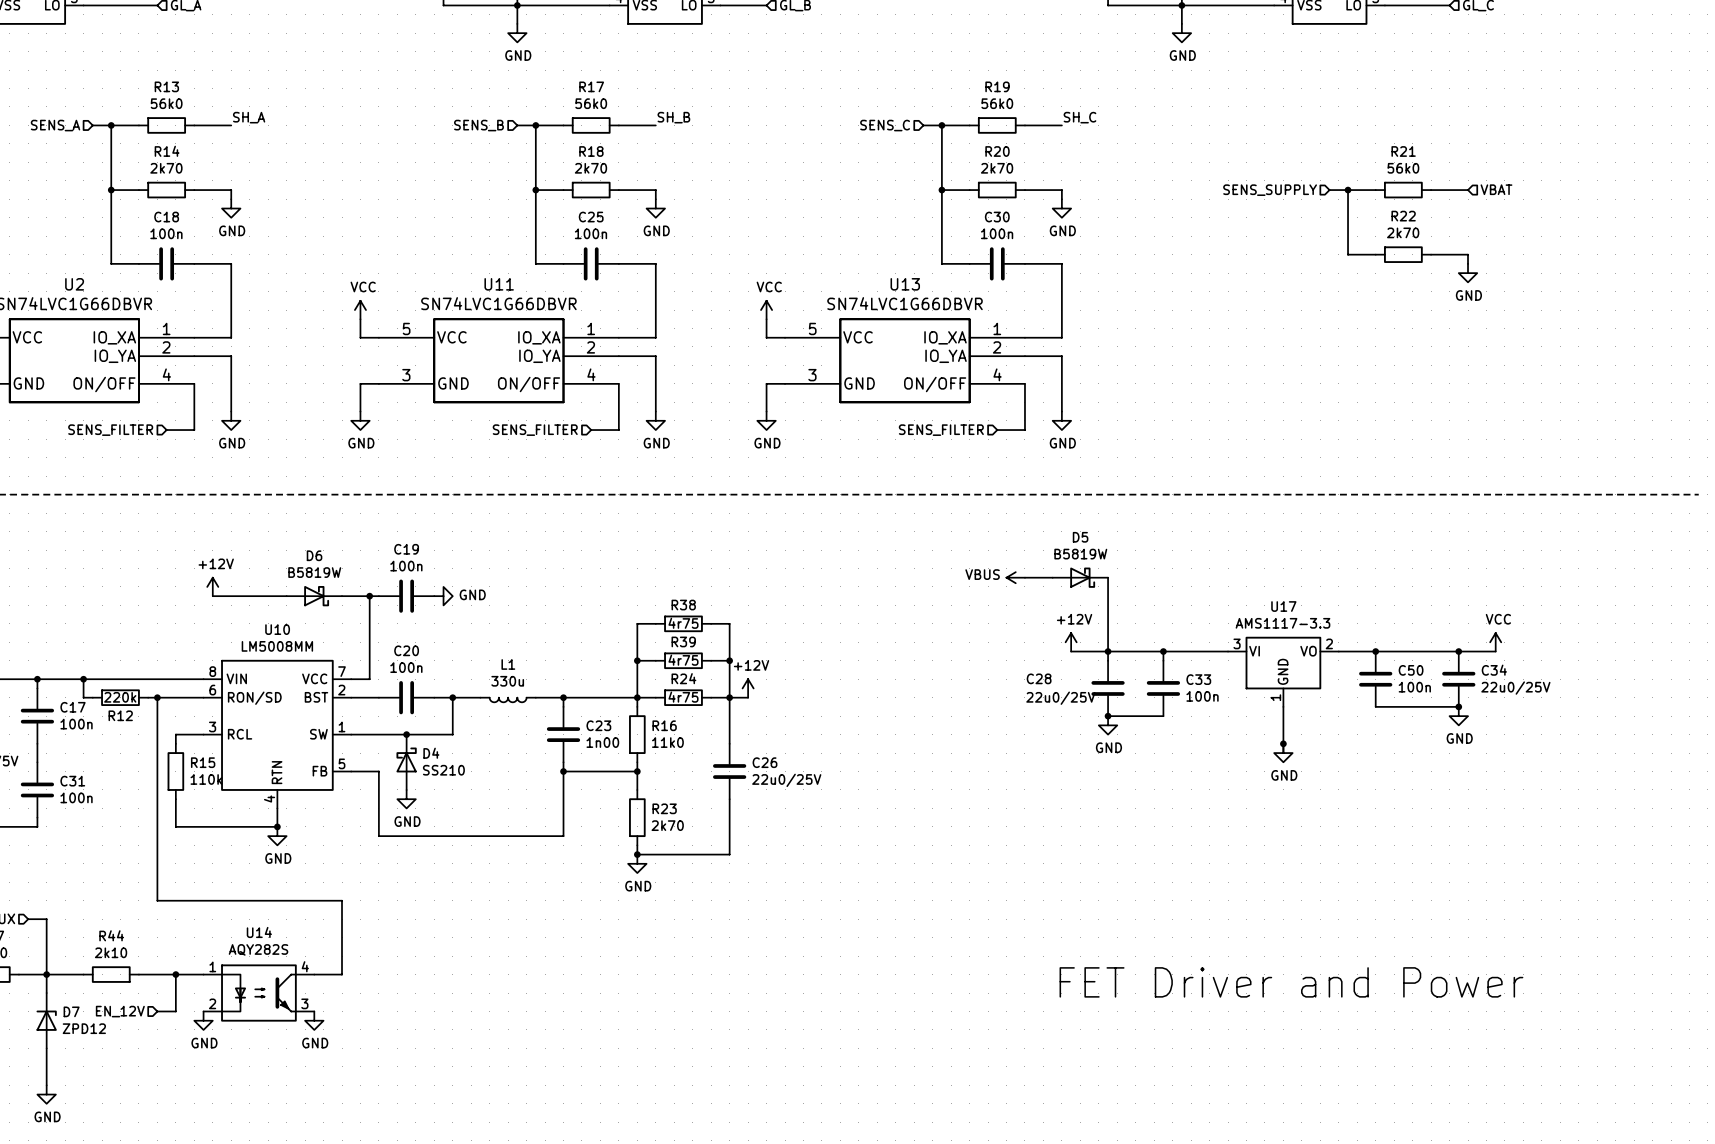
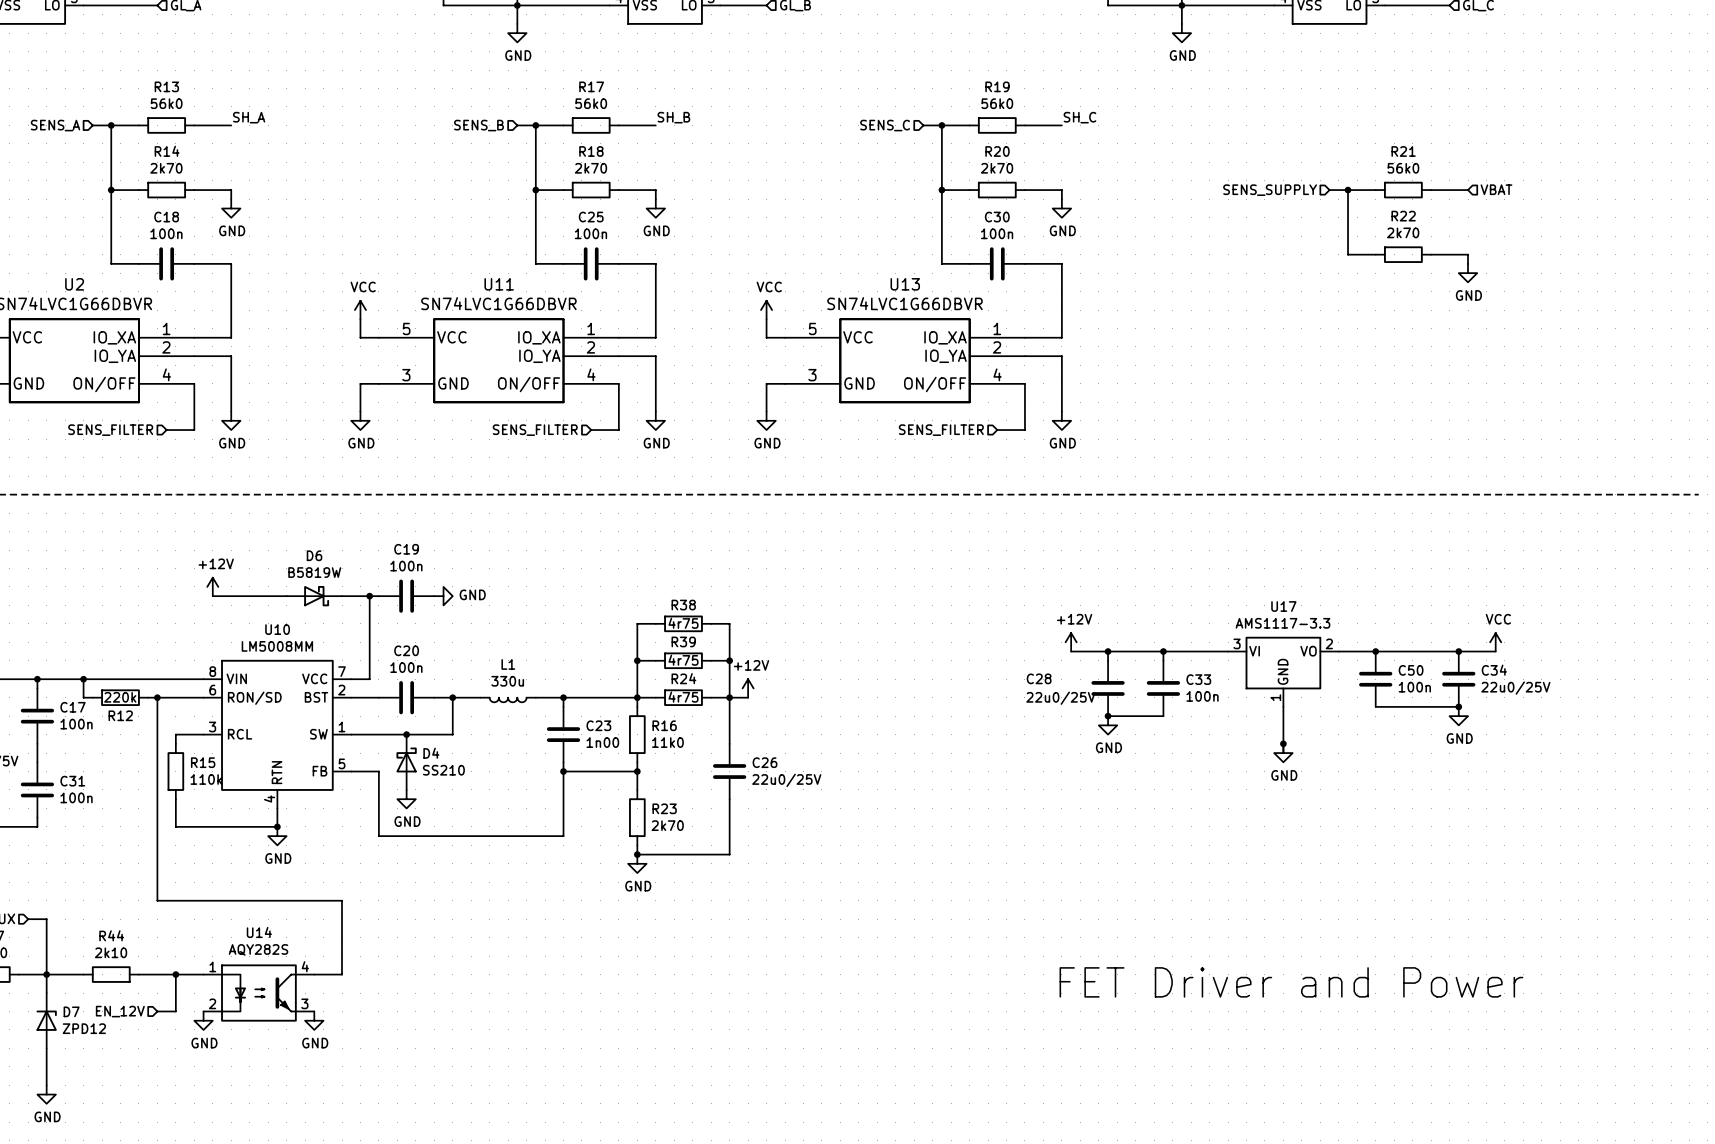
power symbol: VBUS (1015, 577) -> none
wire: (1024, 577) (1052, 577) -> none
D5: B5819W (1080, 577) -> none
wire: (1108, 577) (1108, 651) -> none

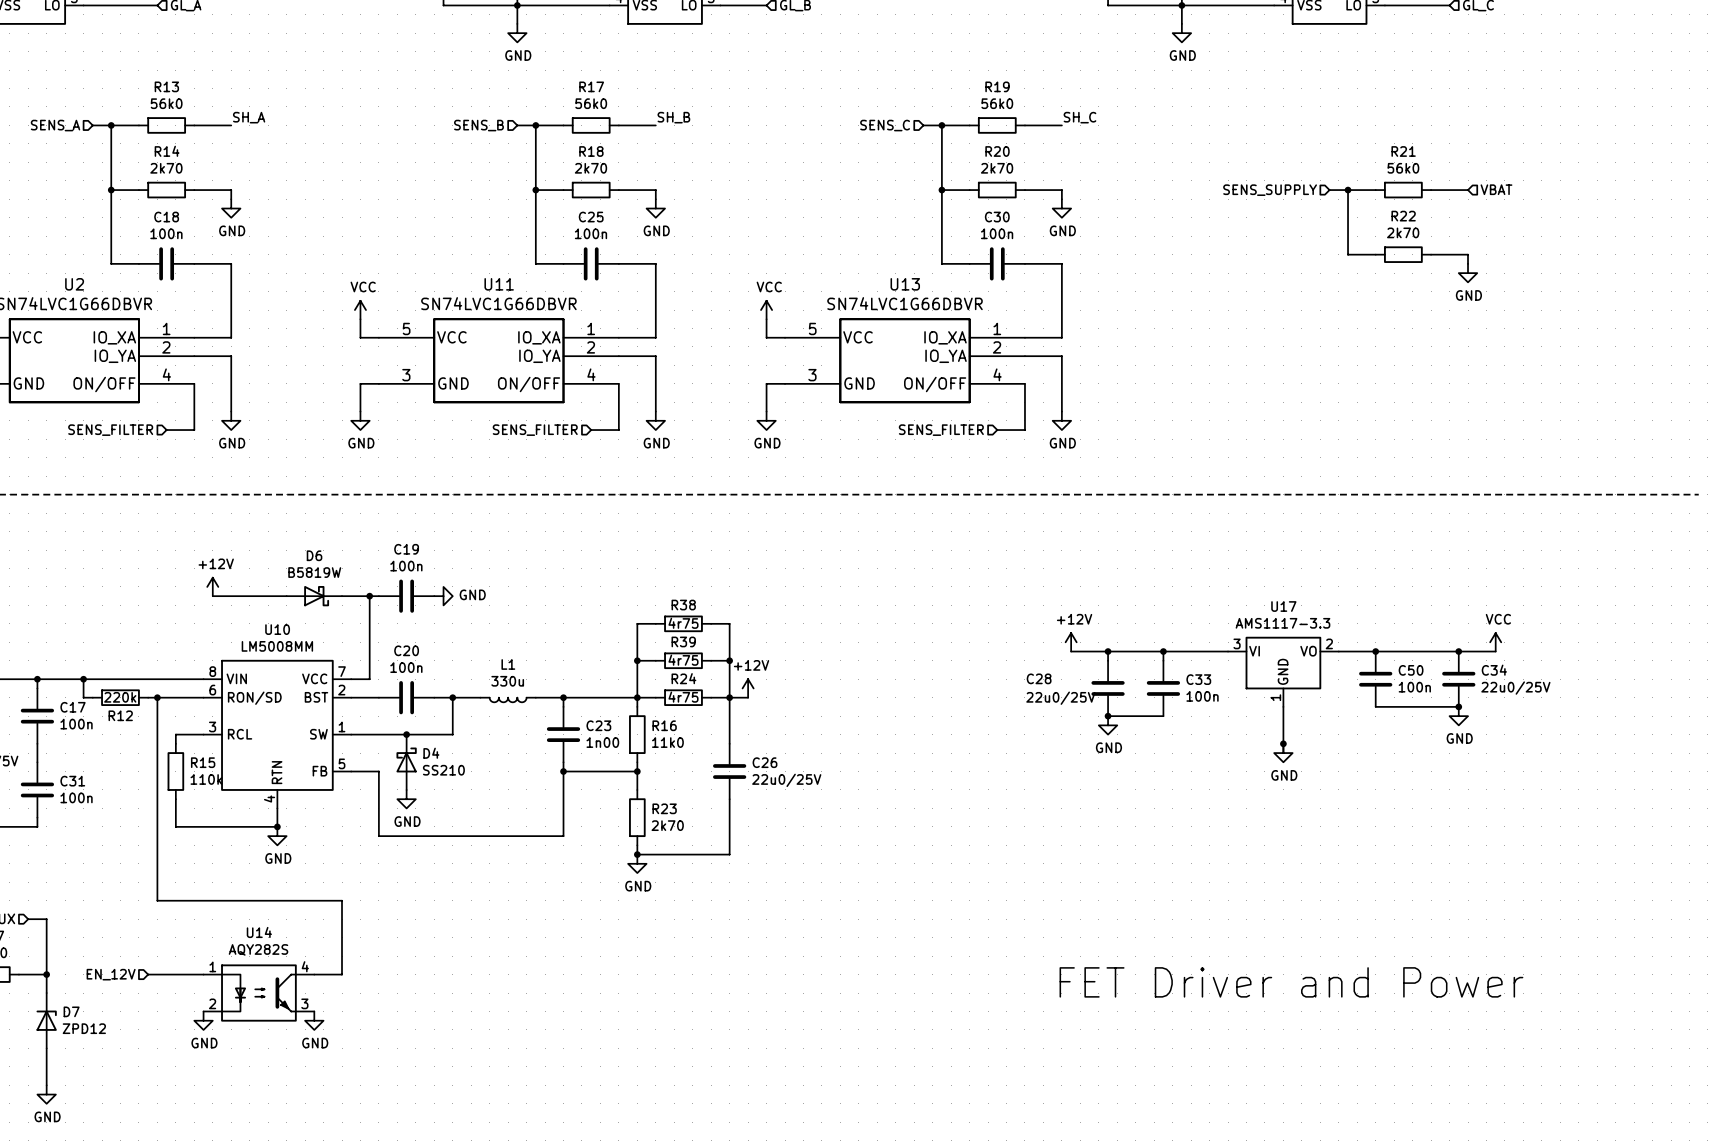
wire: (46, 974) (83, 974) -> none
R44: 2k10 (111, 974) -> none
wire: (138, 974) (148, 974) -> none
wire: (175, 974) (175, 1011) (157, 1011) -> none
junction: (175, 974) -> none
hierarchical label position: EN_12V (120, 1011) -> EN_12V (111, 974)

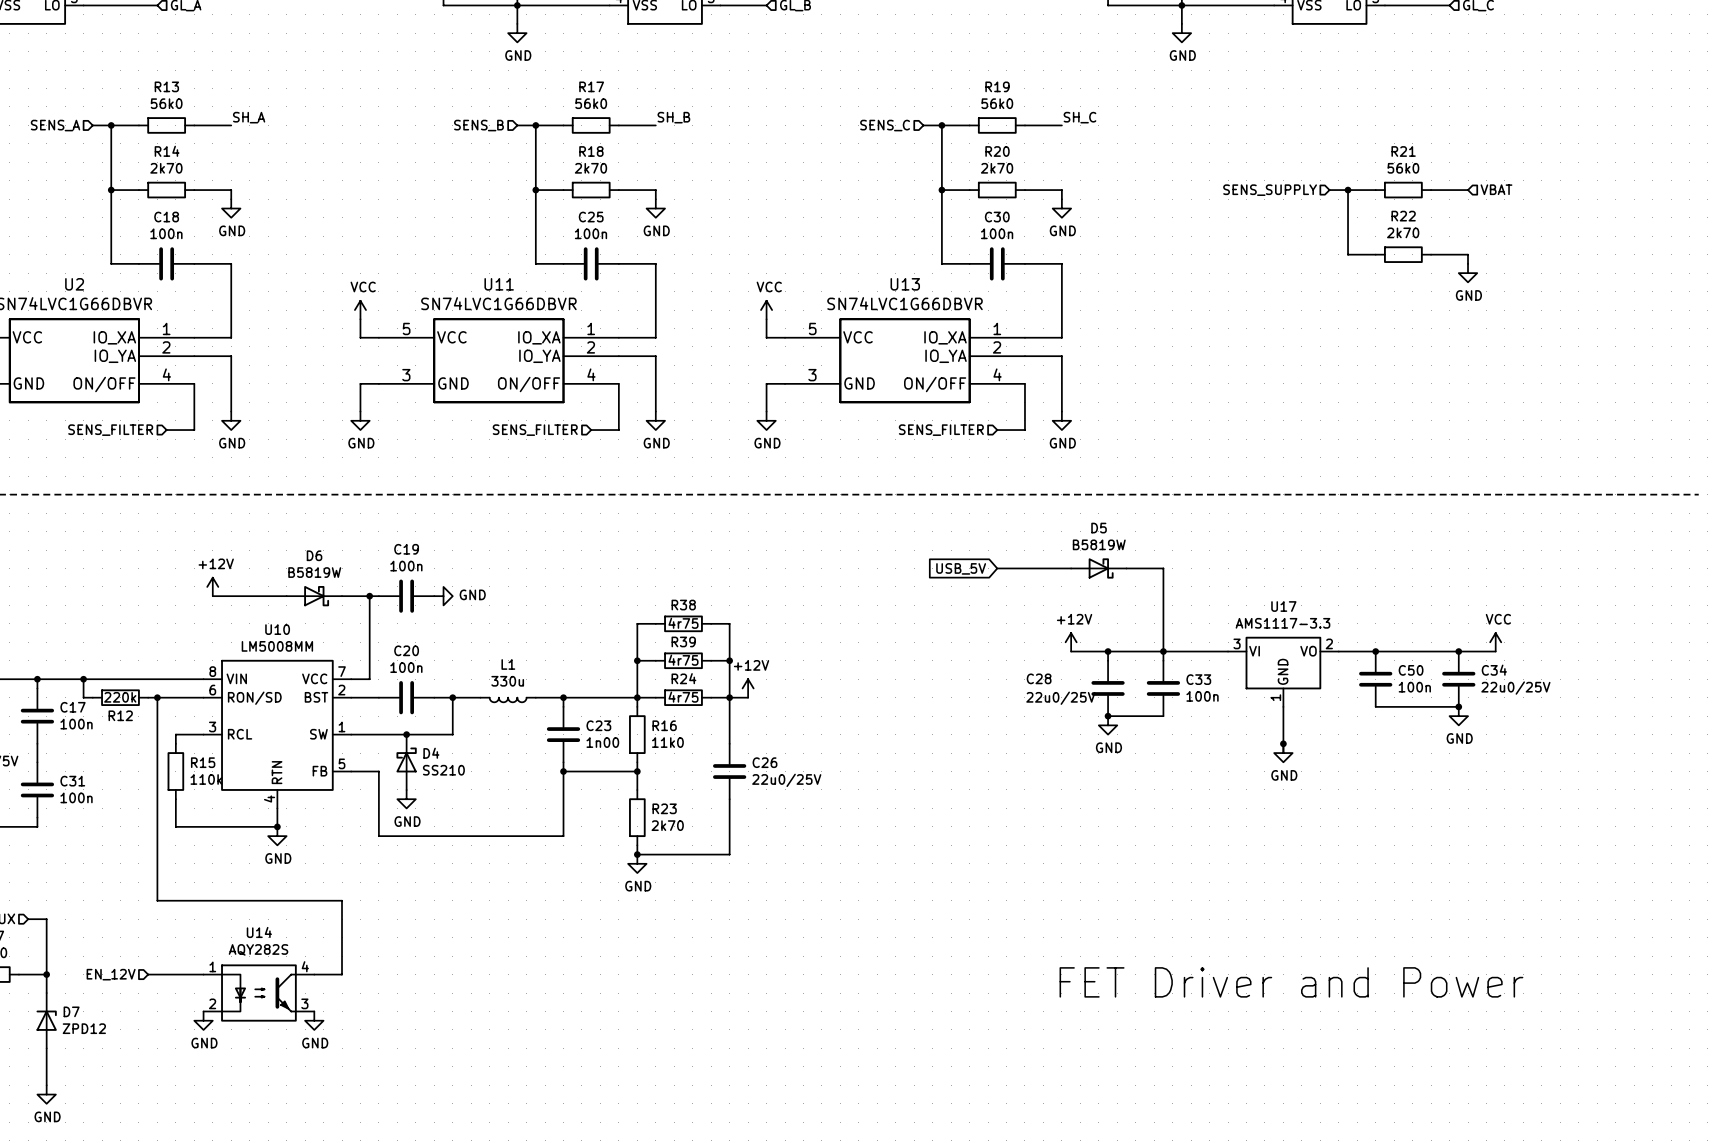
global label: none -> USB_5V (961, 568)
wire: none -> (997, 568) (1071, 568)
D5: none -> B5819W (1098, 568)
wire: none -> (1126, 568) (1163, 568) (1163, 651)

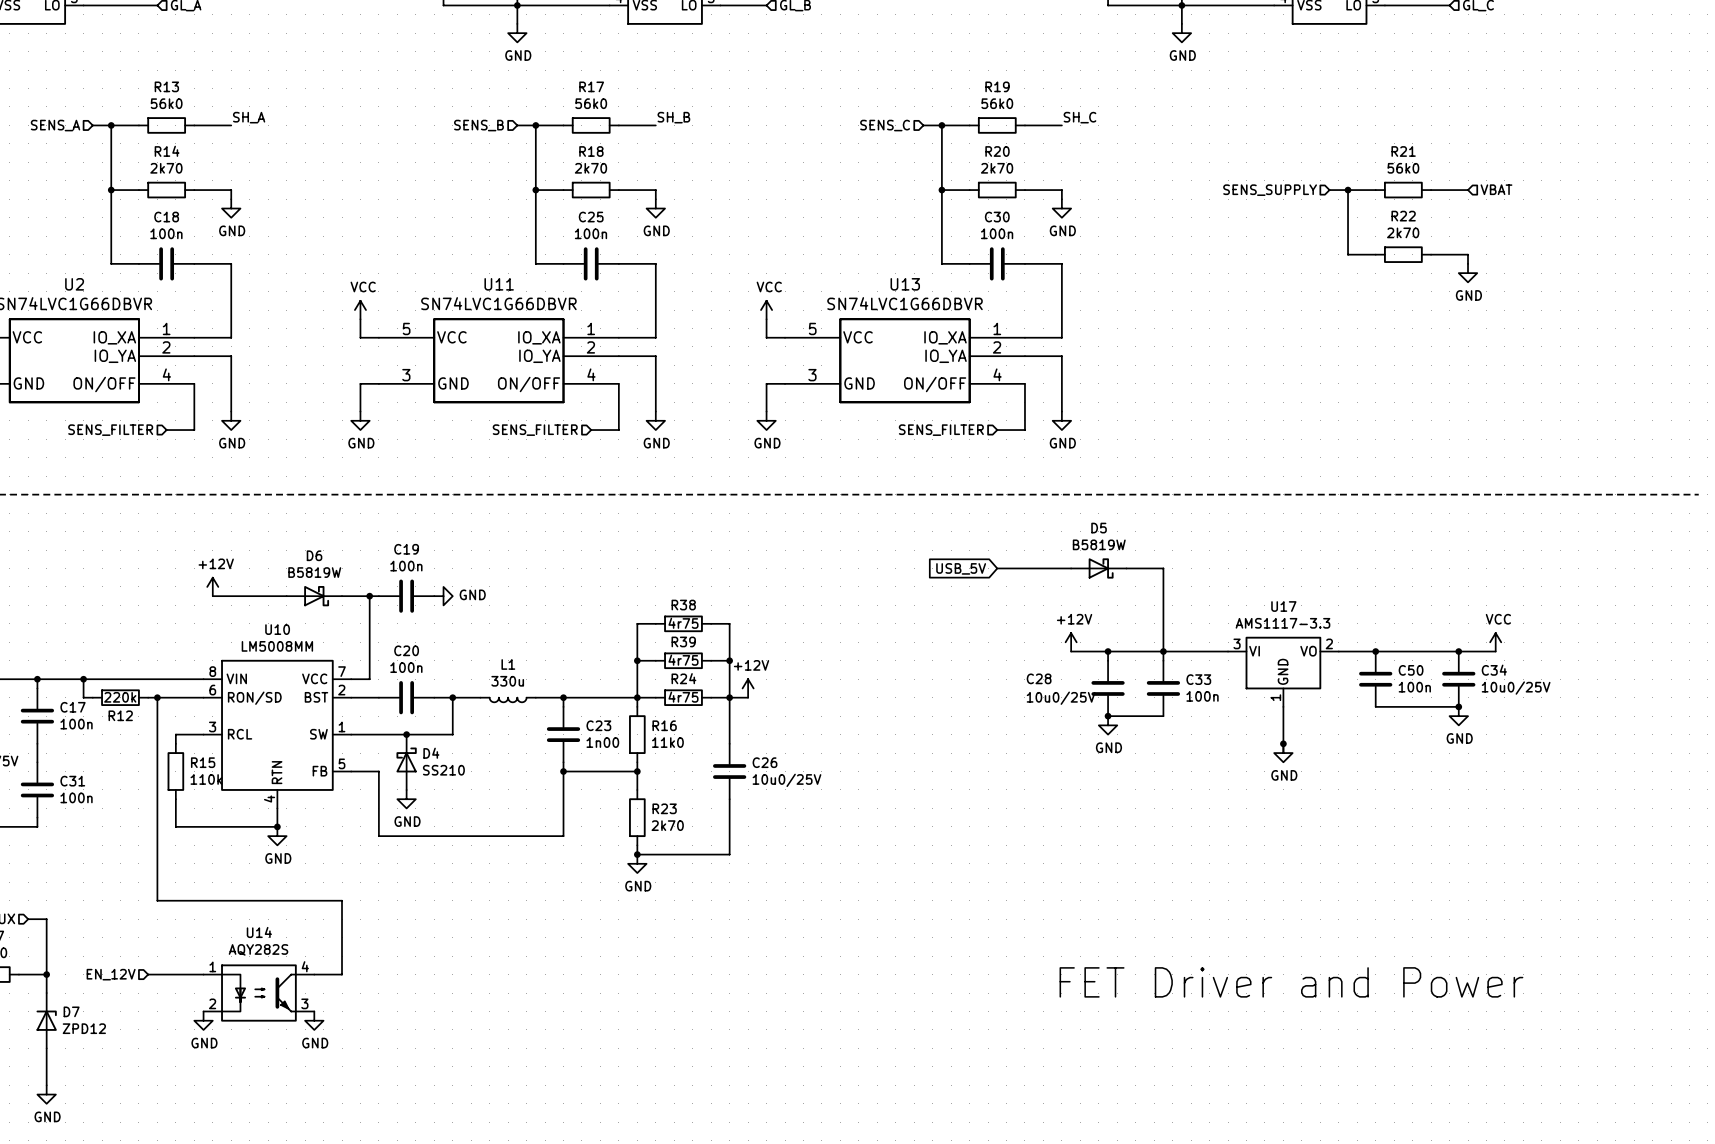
C34 value: 22u0/25V (1515, 688) -> 10u0/25V (1516, 688)
C28 value: 22u0/25V (1060, 698) -> 10u0/25V (1061, 698)
C26 value: 22u0/25V (786, 780) -> 10u0/25V (786, 780)

